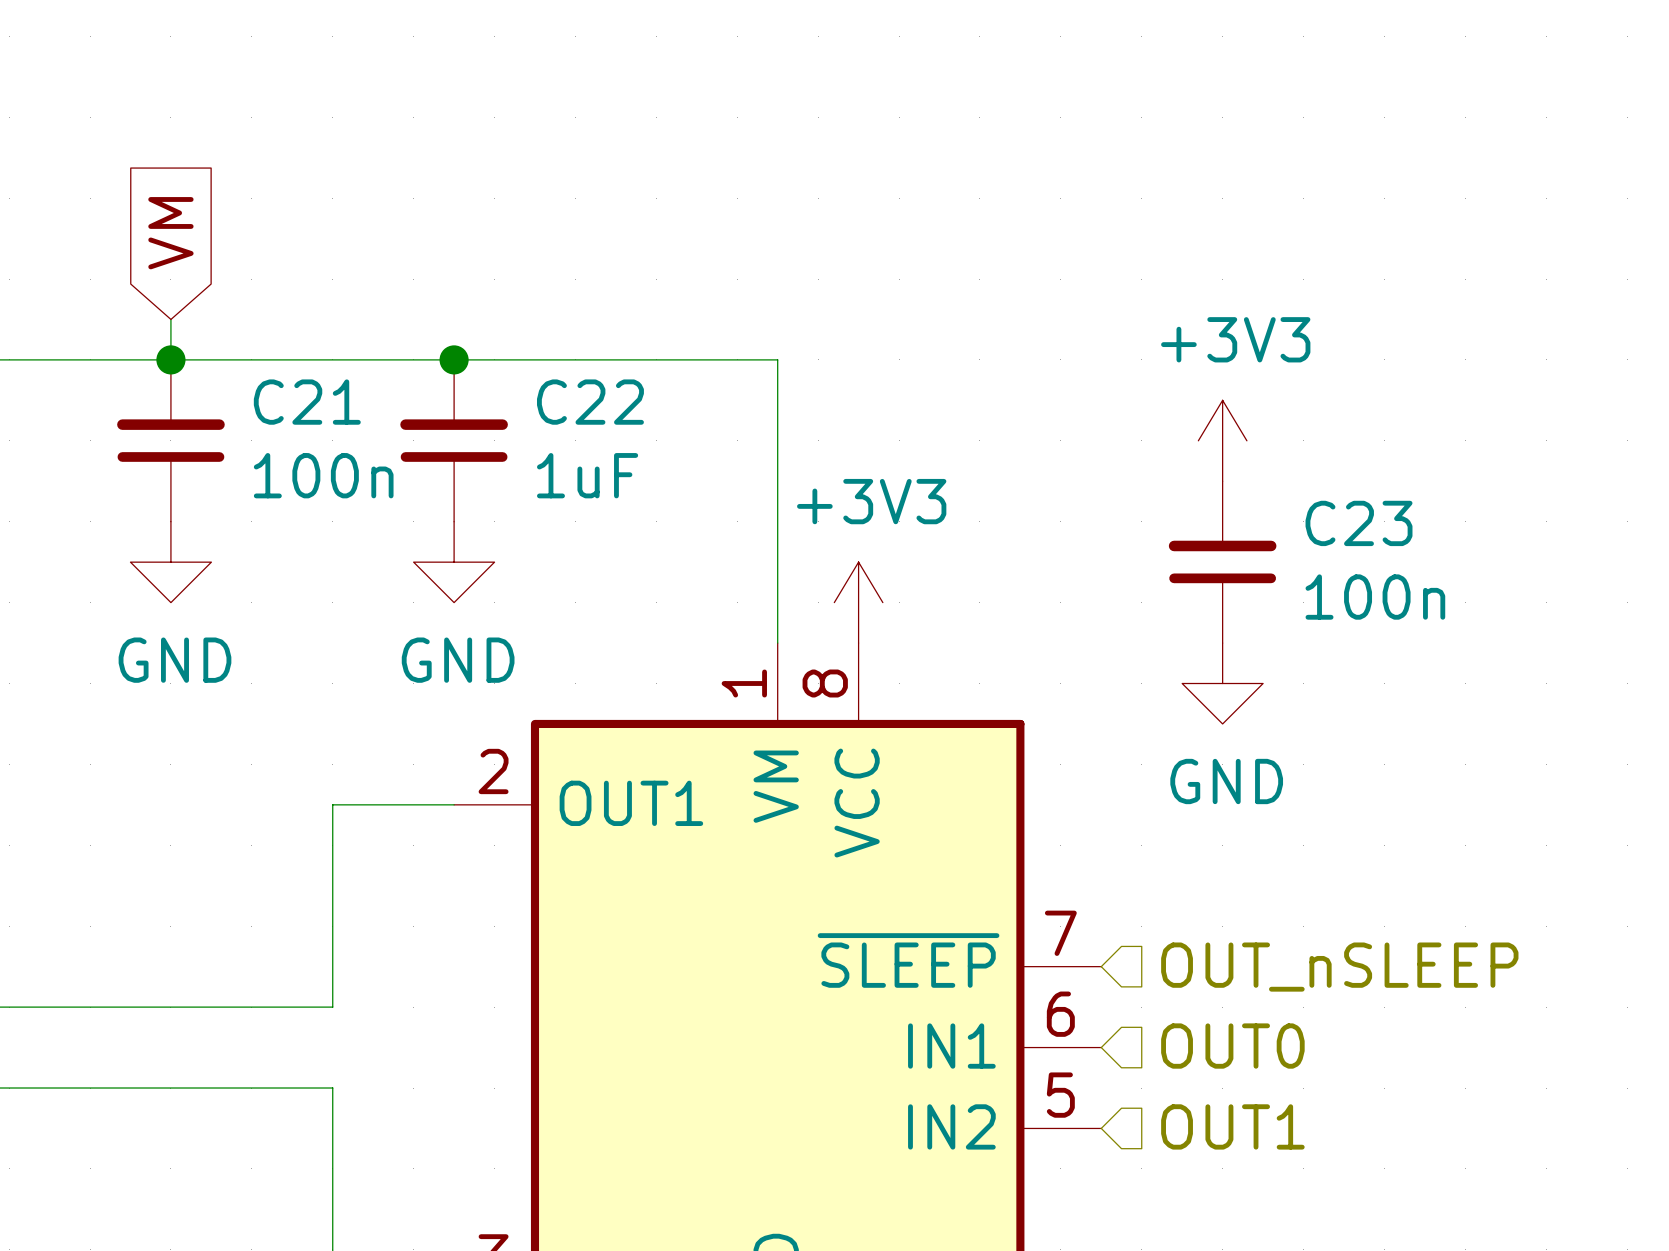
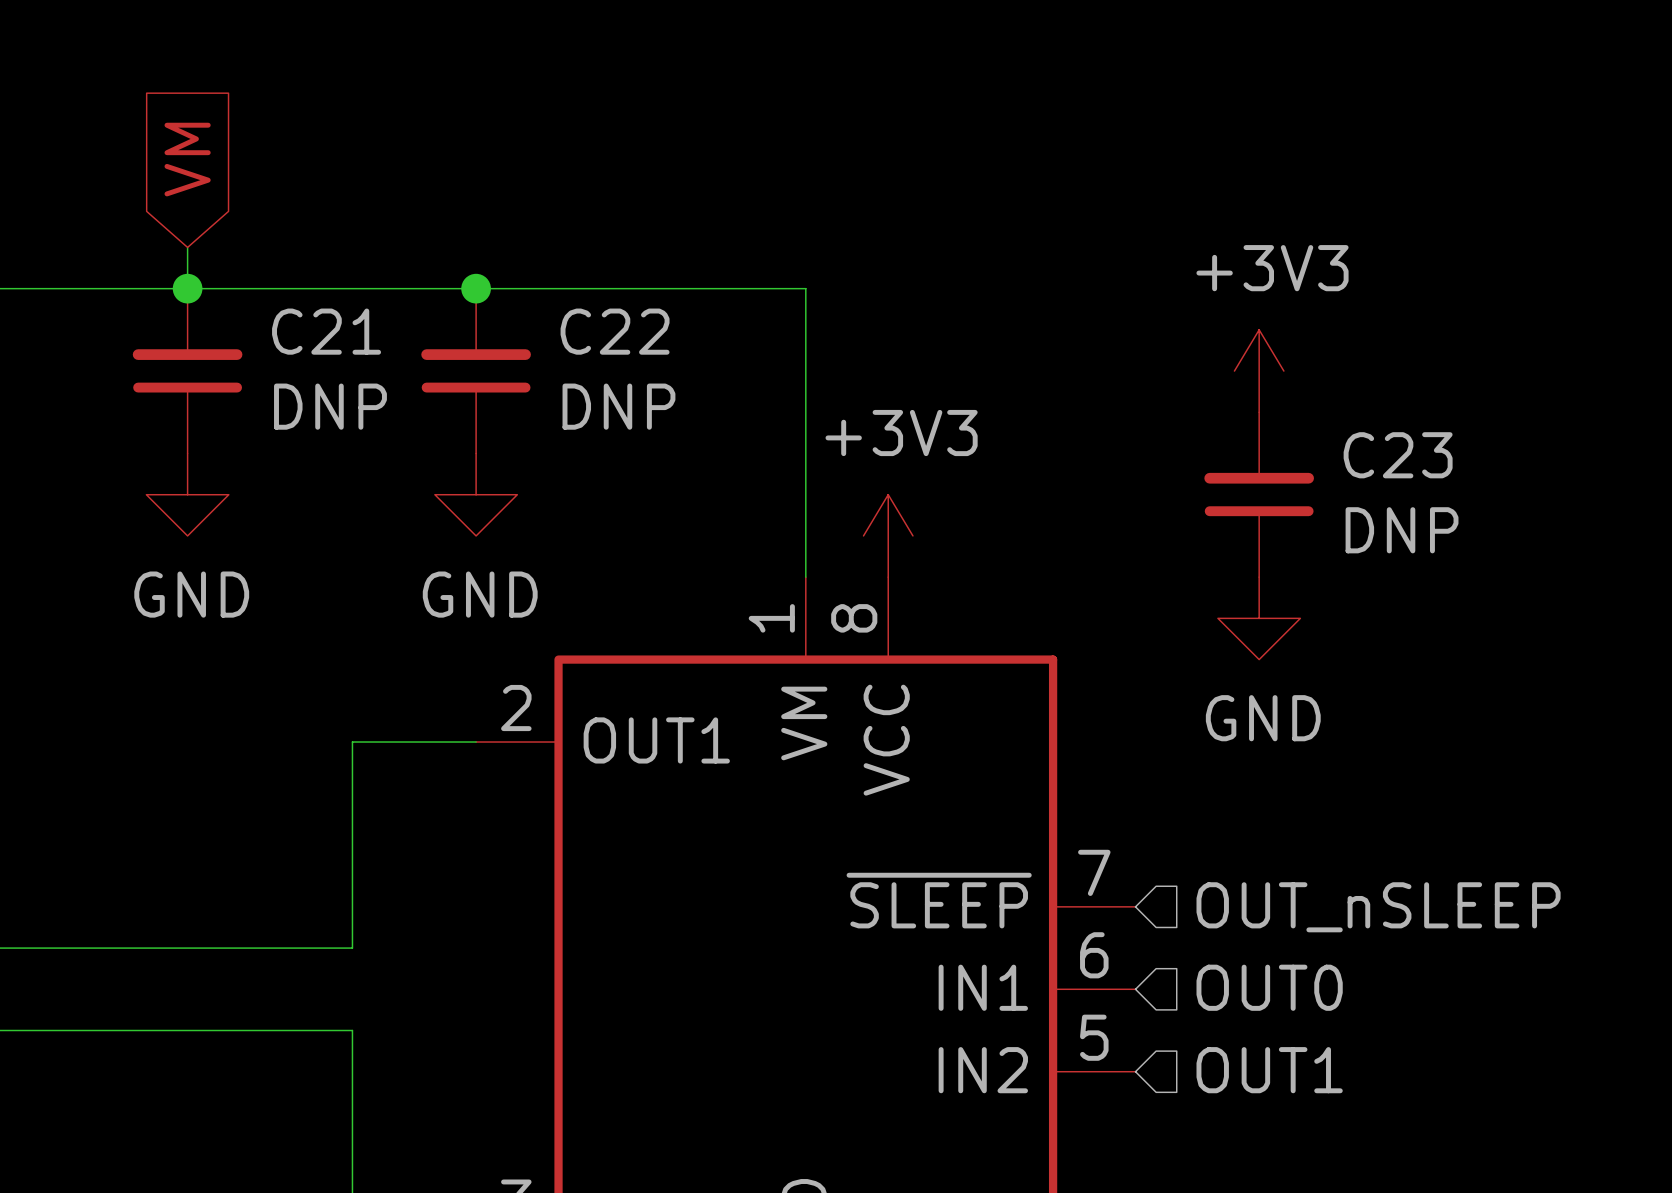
C21 value: 100n (323, 475) -> DNP (330, 406)
C22 value: 1uF (587, 475) -> DNP (618, 406)
C23 value: 100n (1375, 597) -> DNP (1402, 530)

